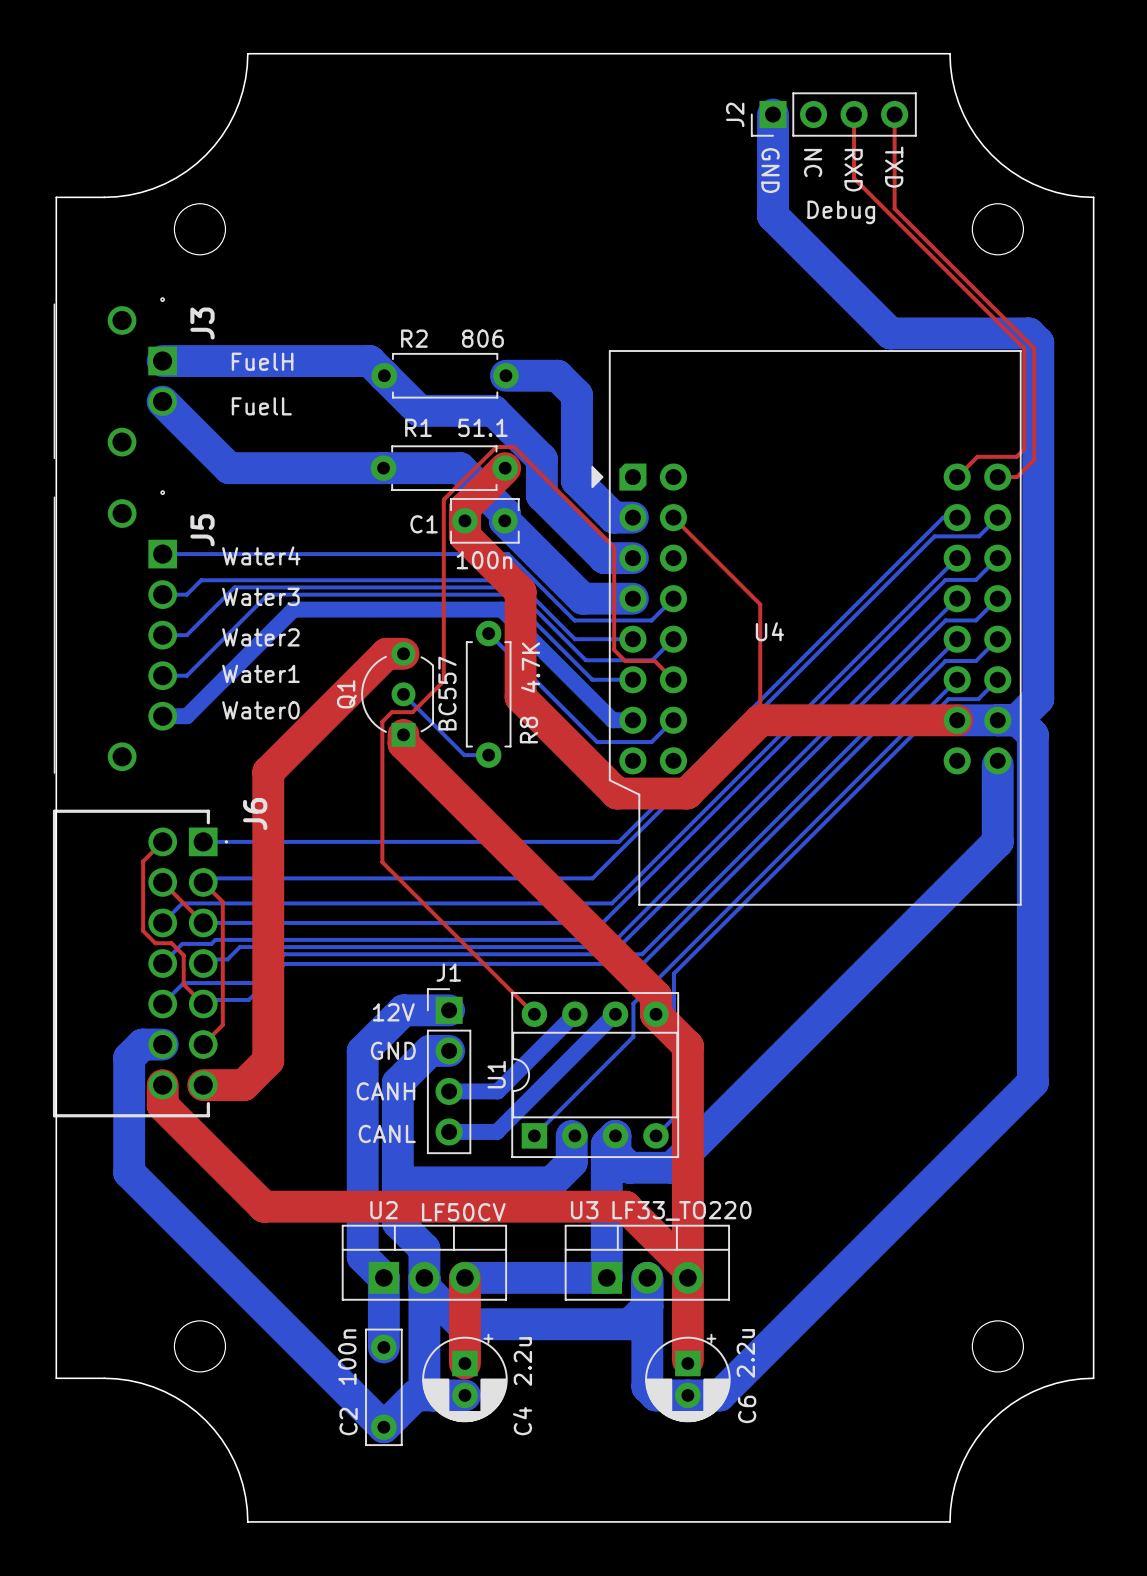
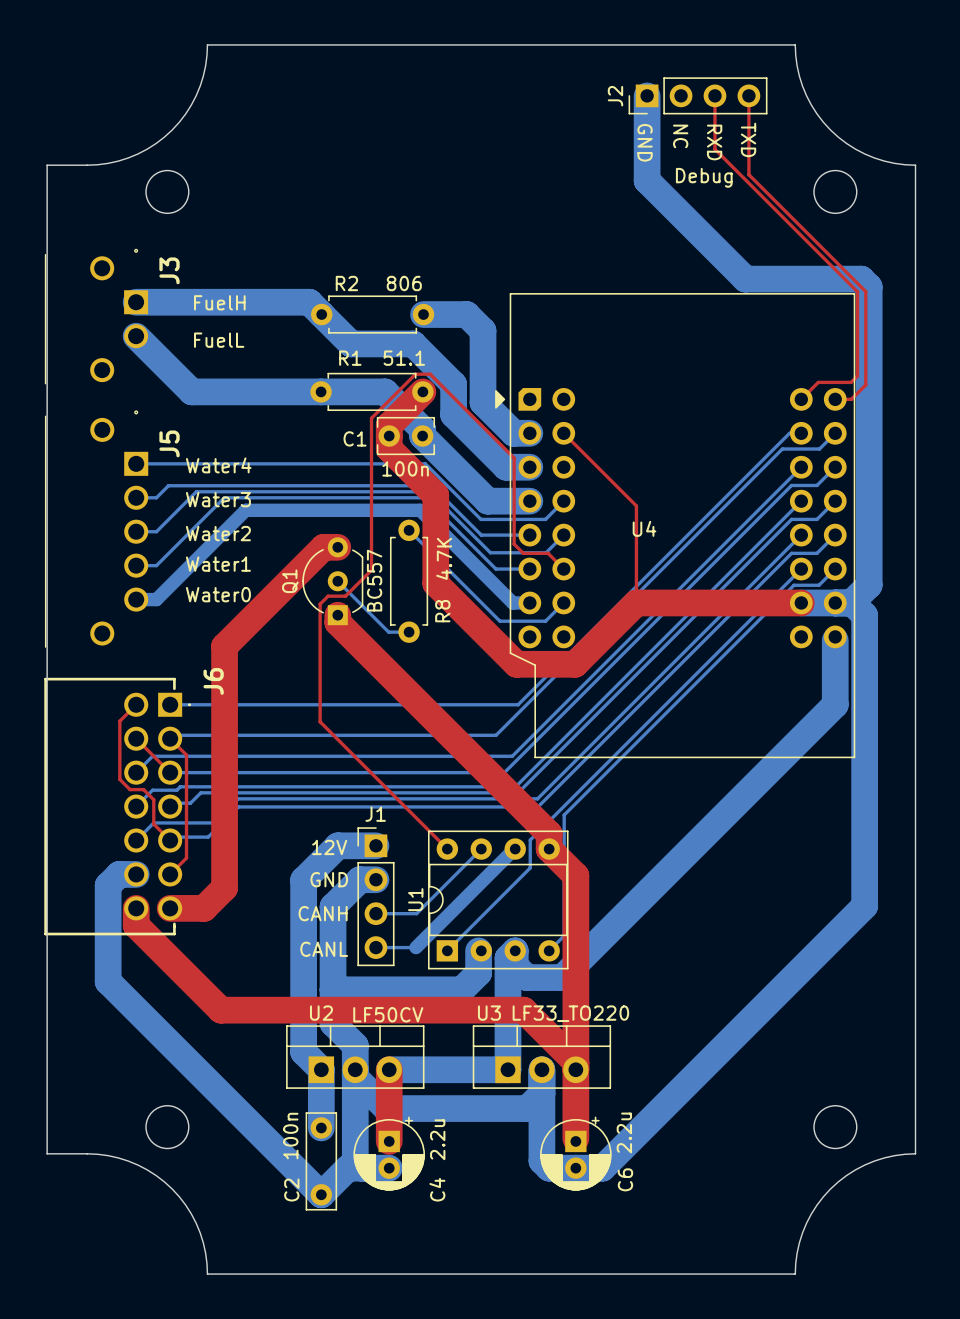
bottom track width: thick (574, 1014) (497, 1091) (449, 1091) -> thin (481, 849) (416, 913) (375, 913)
bottom track width: thick (449, 1131) (496, 1131) -> thin (375, 947) (415, 947)

